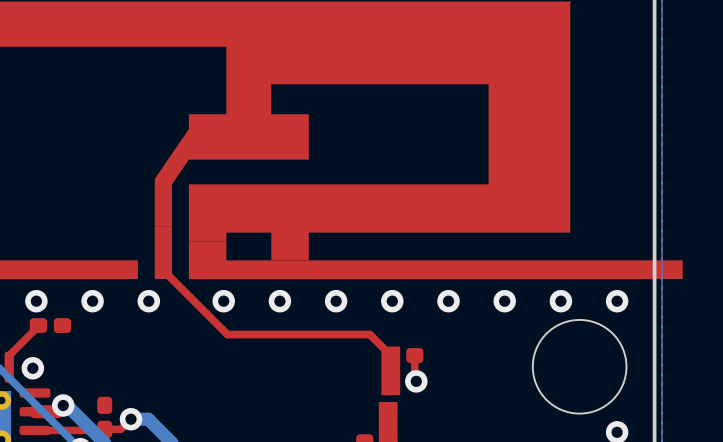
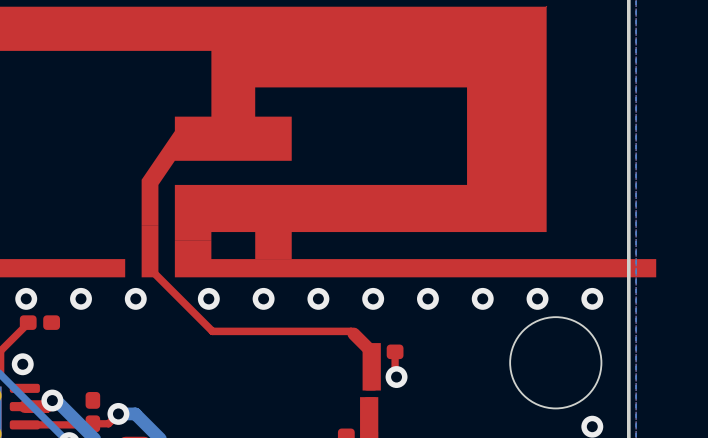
top track width: thin (372, 337) (390, 355) -> thick (353, 333) (371, 351)

